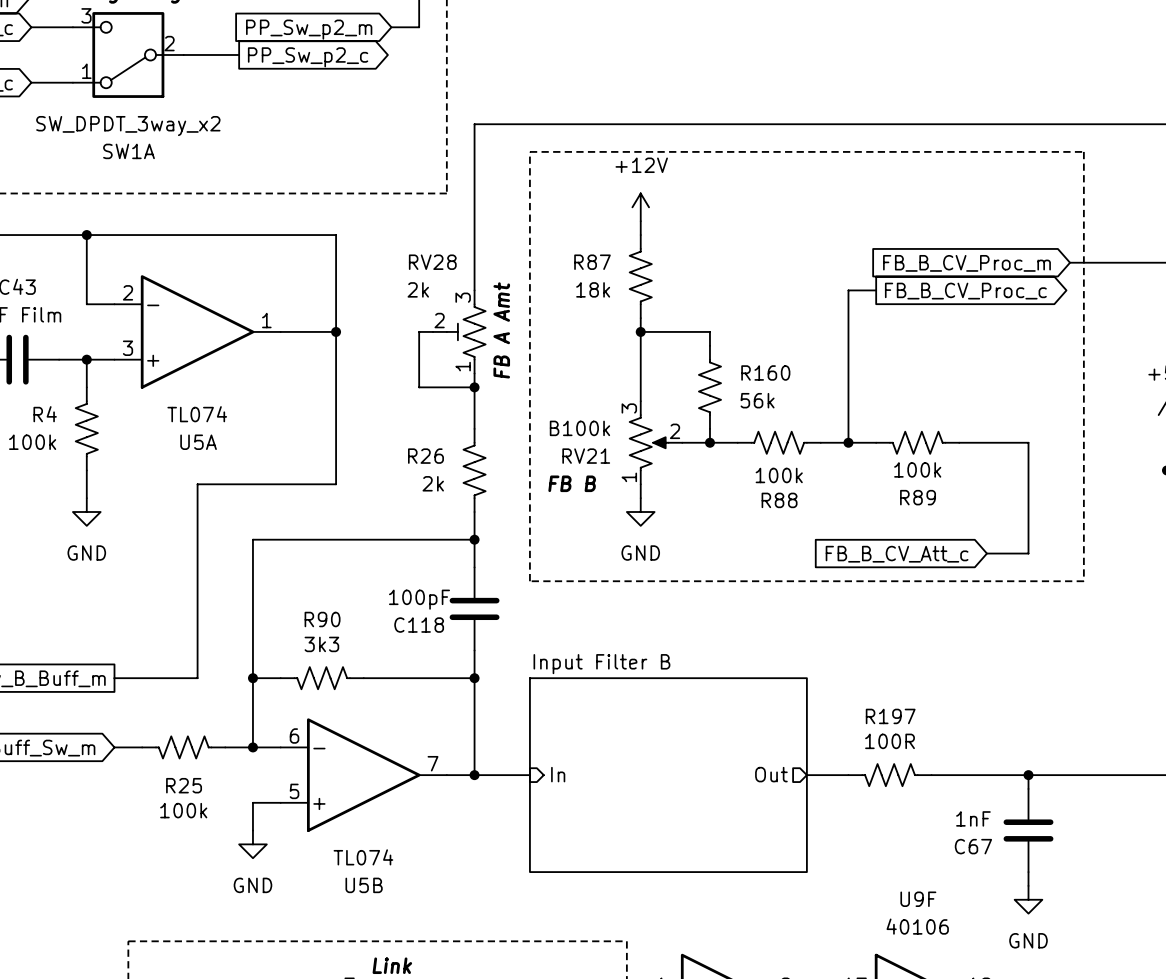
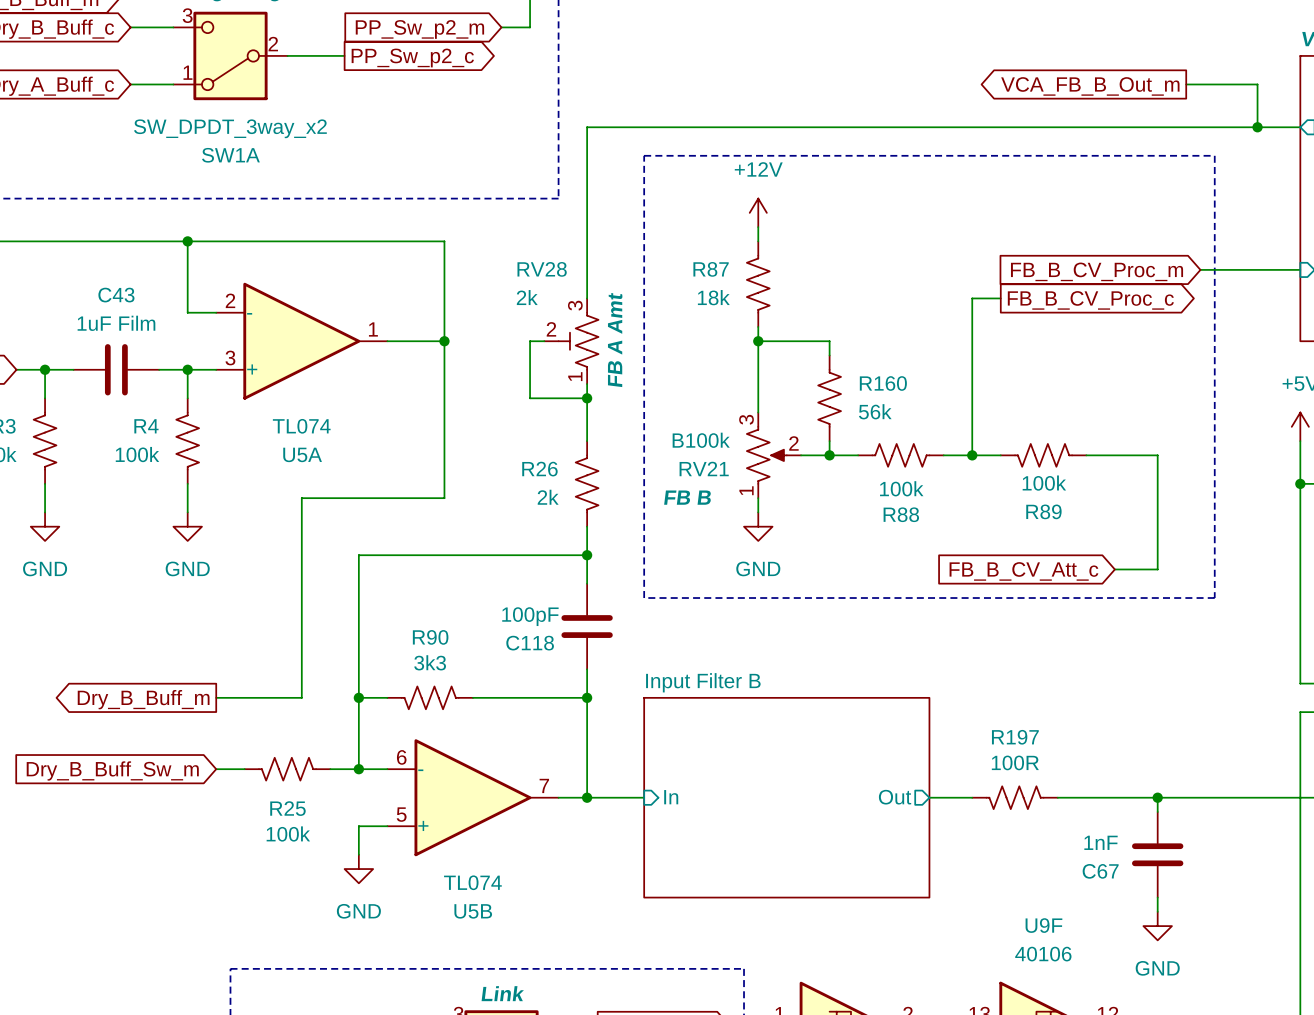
wire: none -> (1186, 84) (1257, 84) (1257, 127)
global label: none -> VCA_FB_B_Out_m (1090, 86)
junction: none -> (1257, 127)

